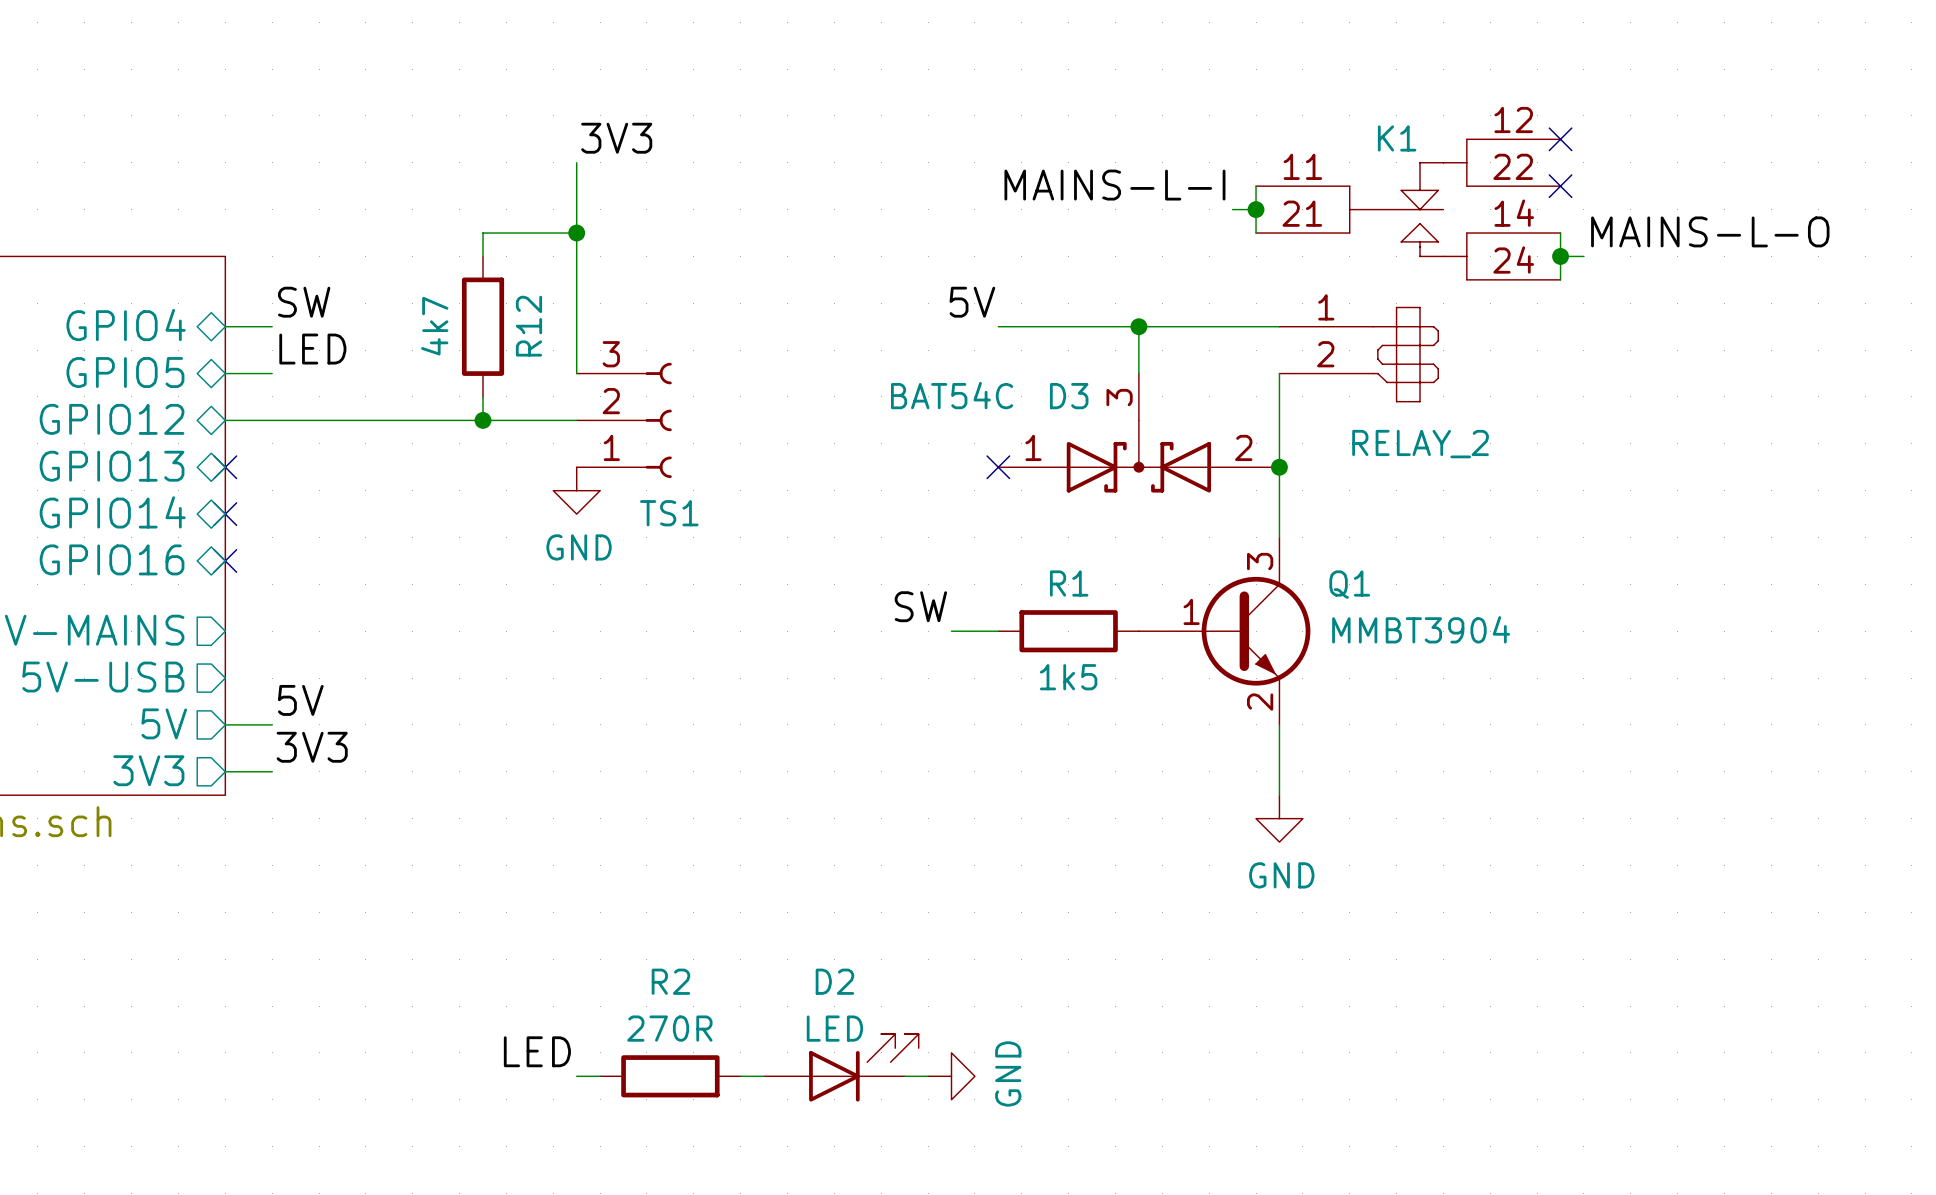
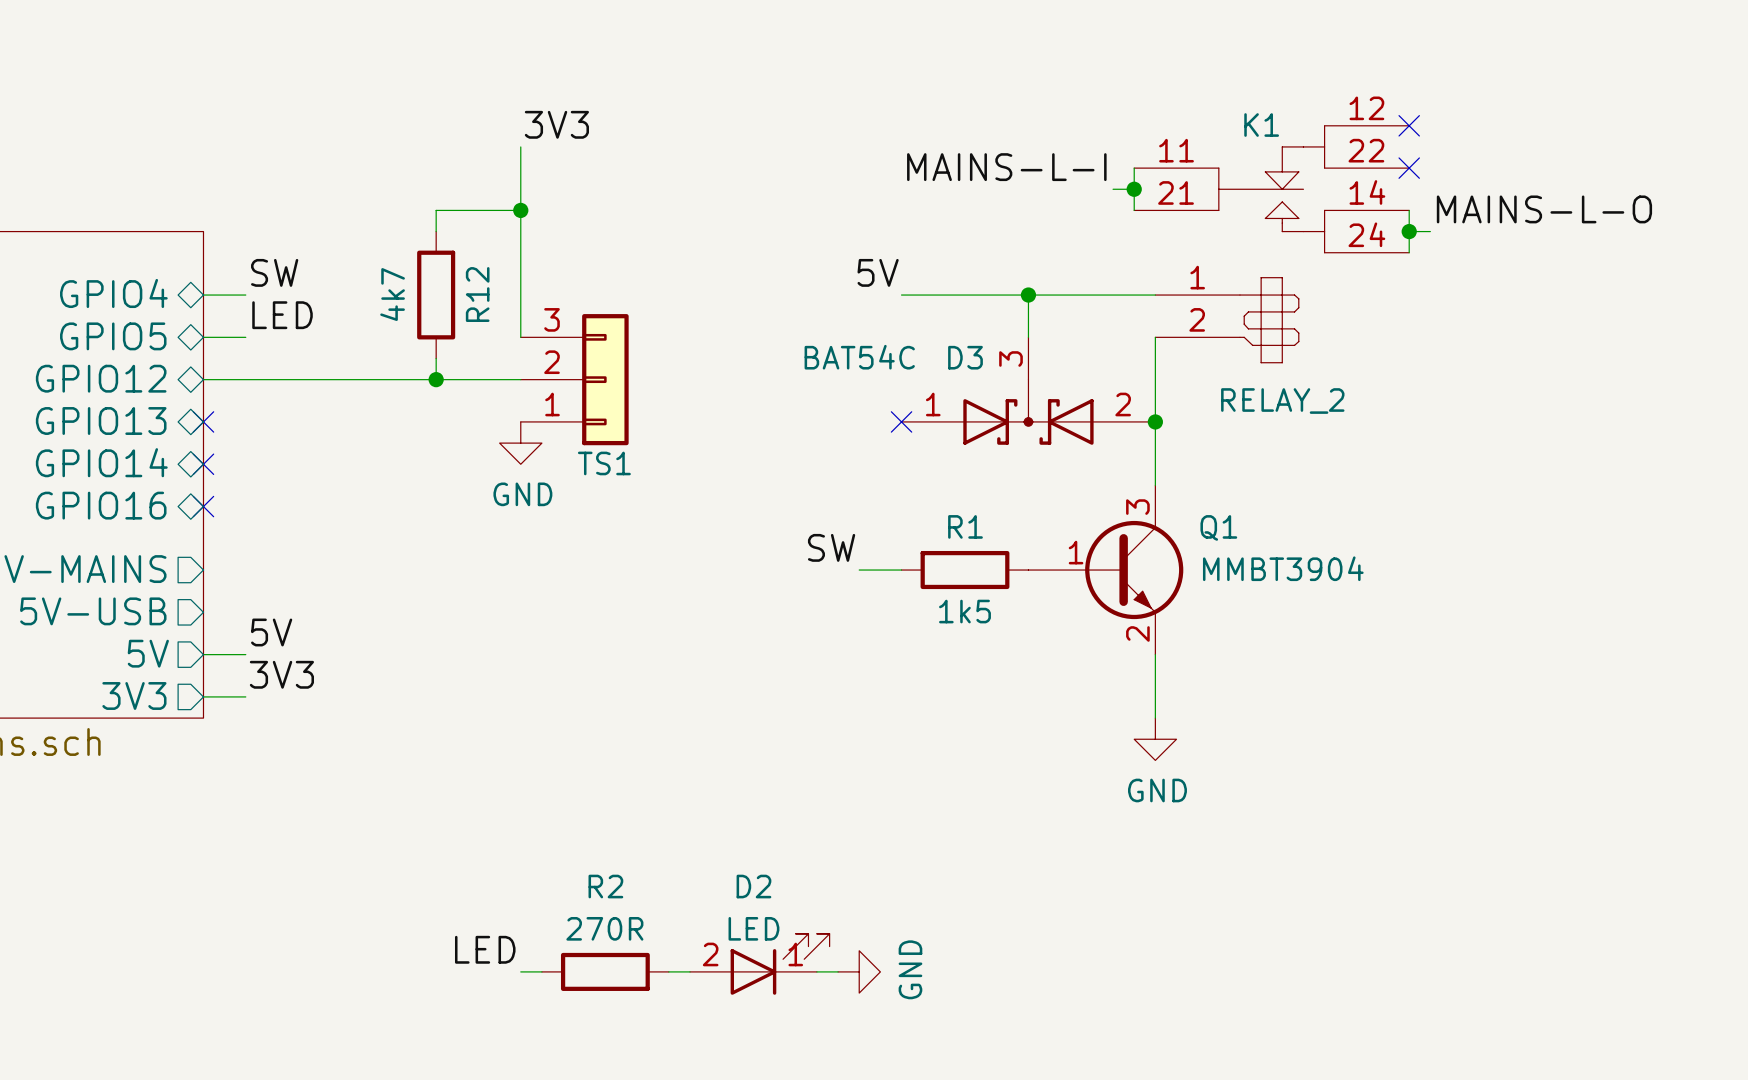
TS1 symbol: [576, 362, 672, 479] -> [520, 314, 629, 446]
D2 pin number: none -> 2 (710, 954)
D2 pin number: none -> 1 (795, 954)

